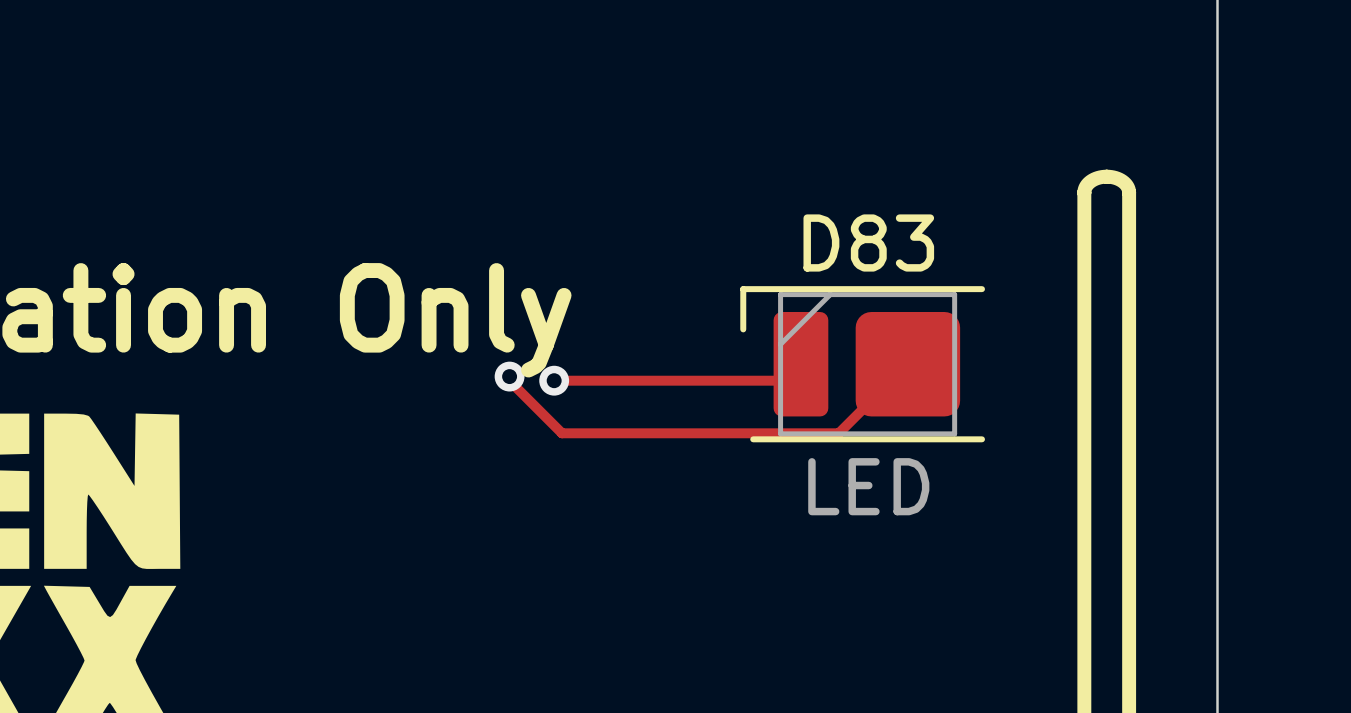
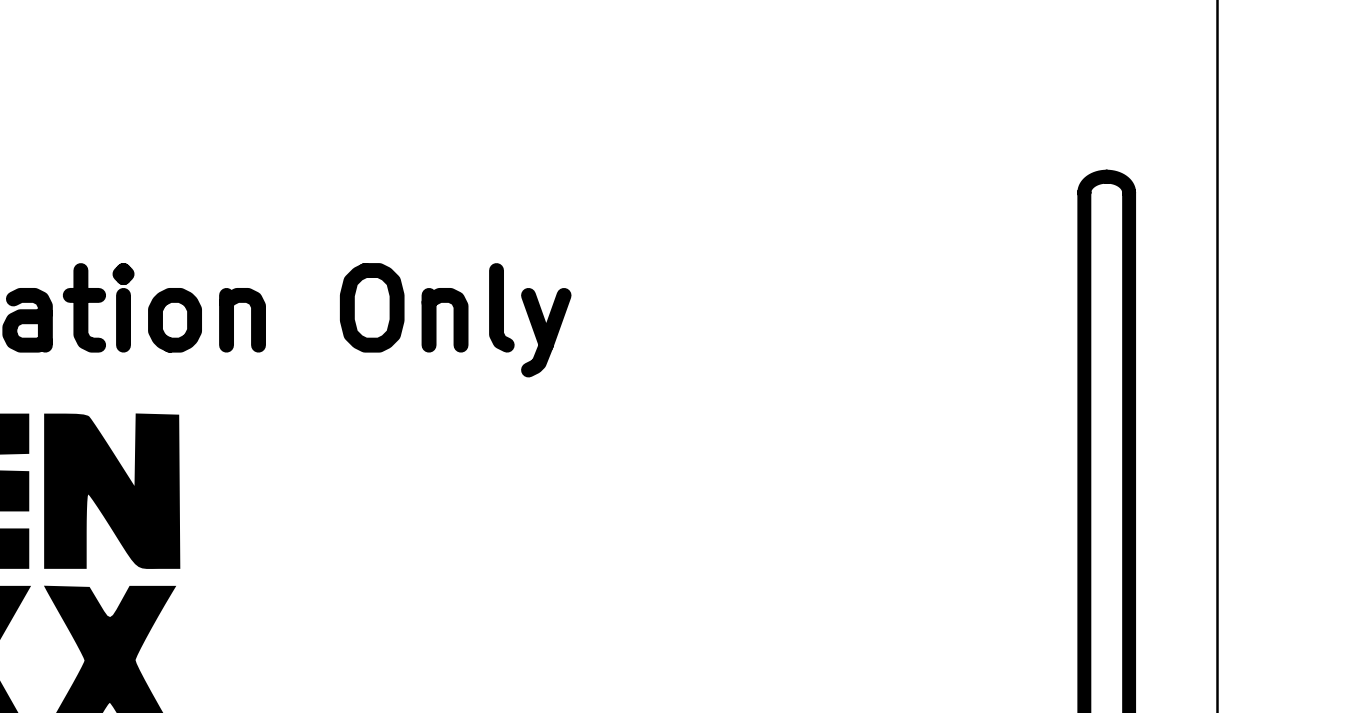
track: (800, 364) (784, 380) (554, 380) -> none
D83: LED (862, 364) -> none
track: (907, 364) (838, 433) (562, 433) (509, 380) (509, 376) -> none
via: (509, 376) -> none
via: (554, 380) -> none

